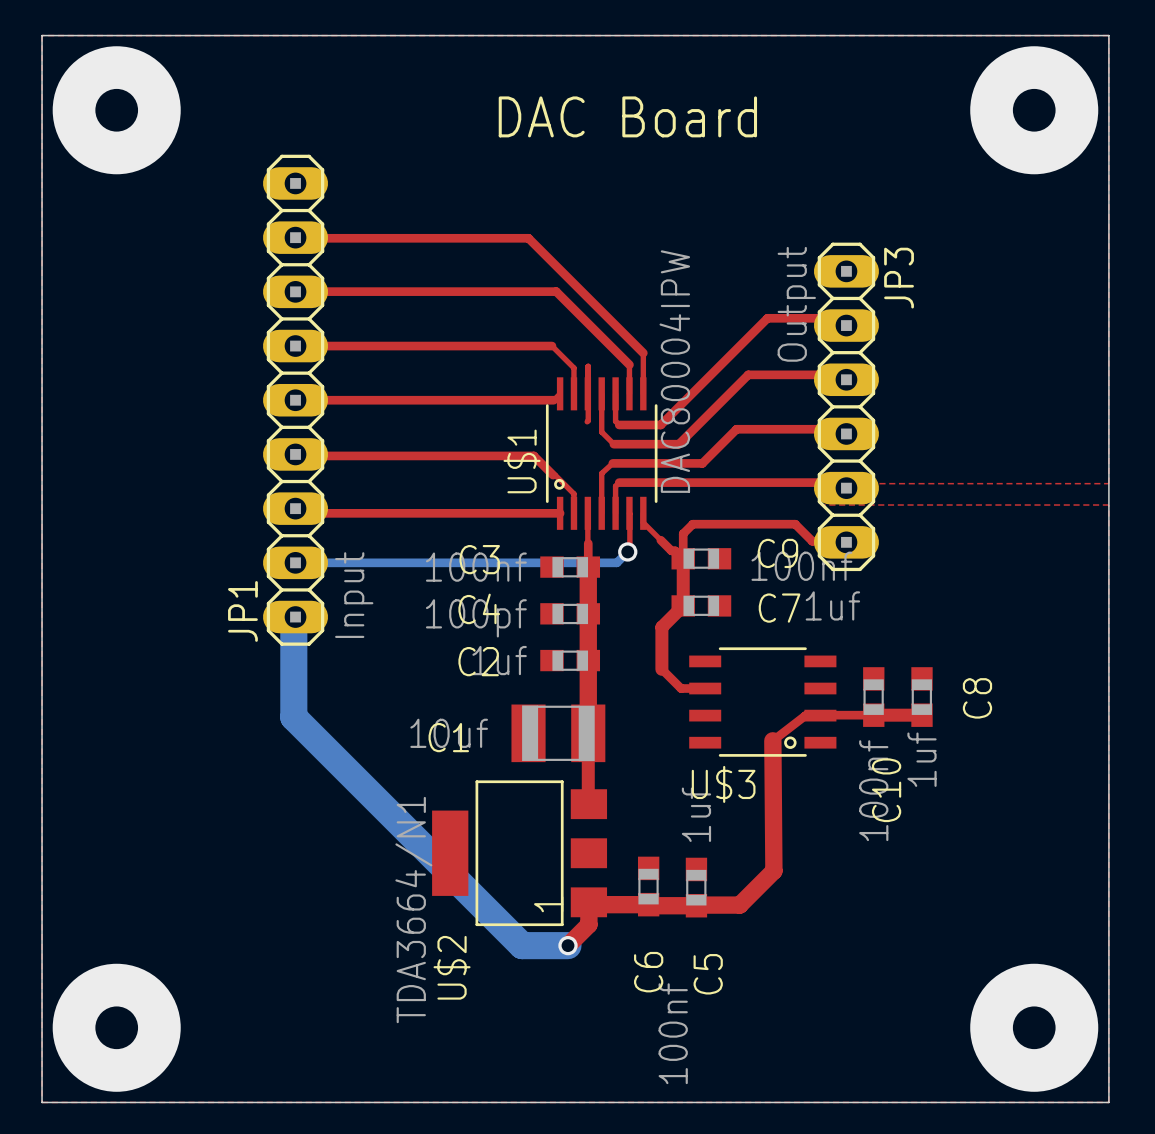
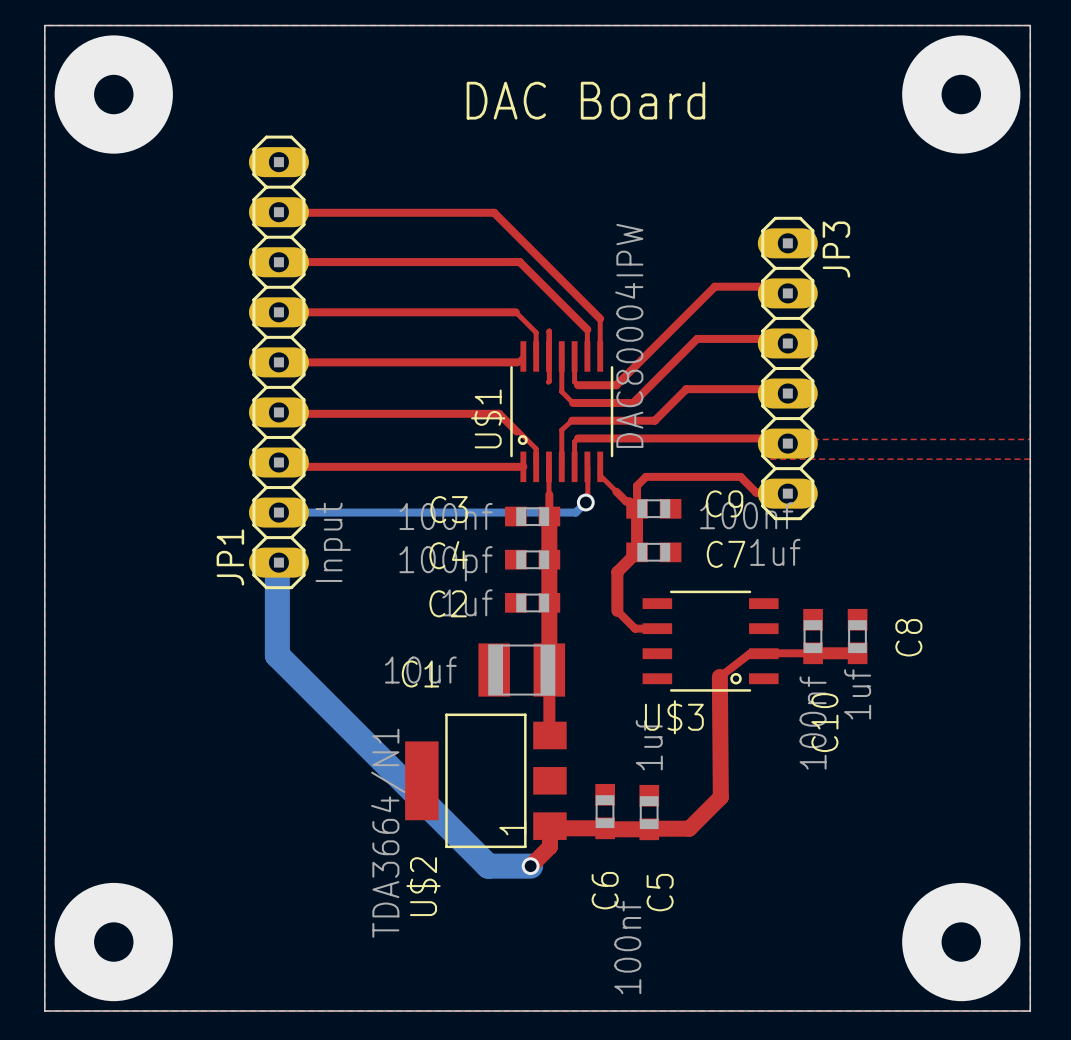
JP3 value: Output (796, 304) -> none

